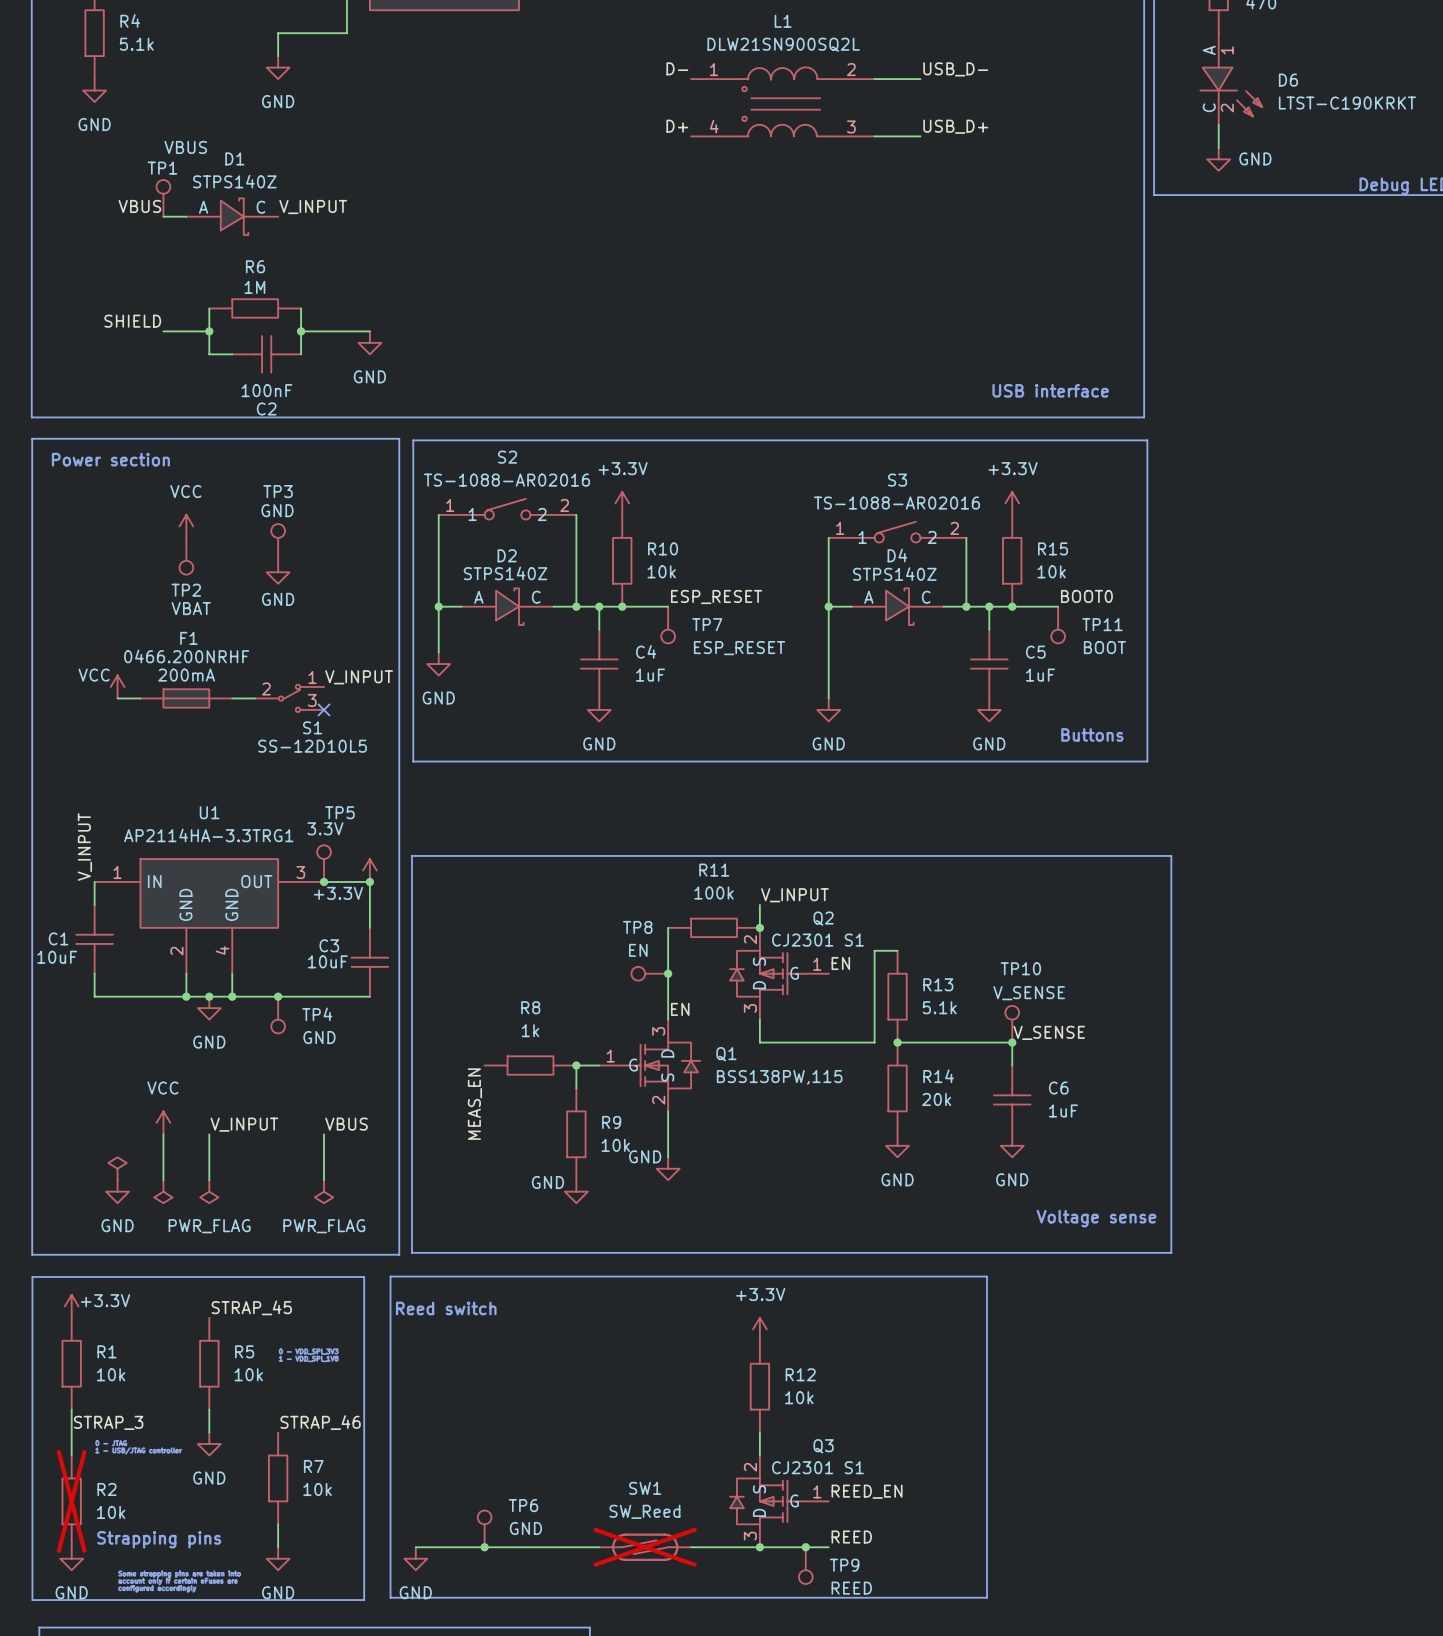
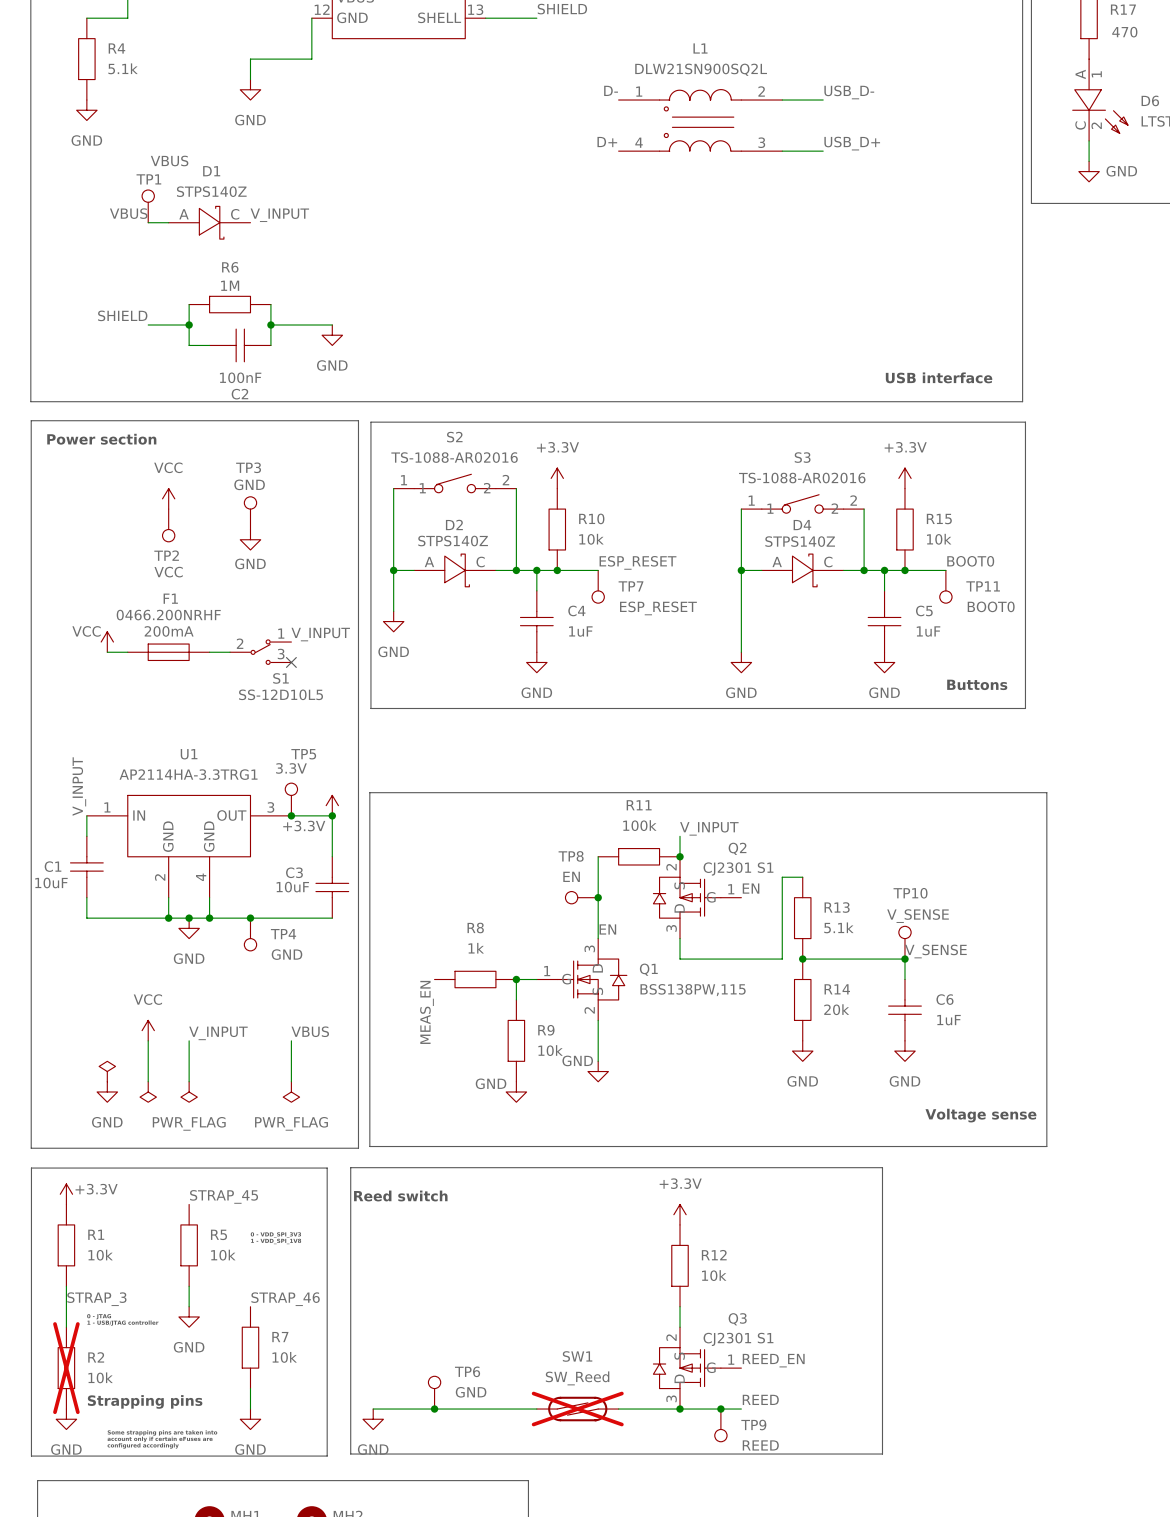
TP2 value: VBAT (191, 608) -> VCC (168, 572)
TP11 value: BOOT (1104, 647) -> BOOT0 (991, 606)

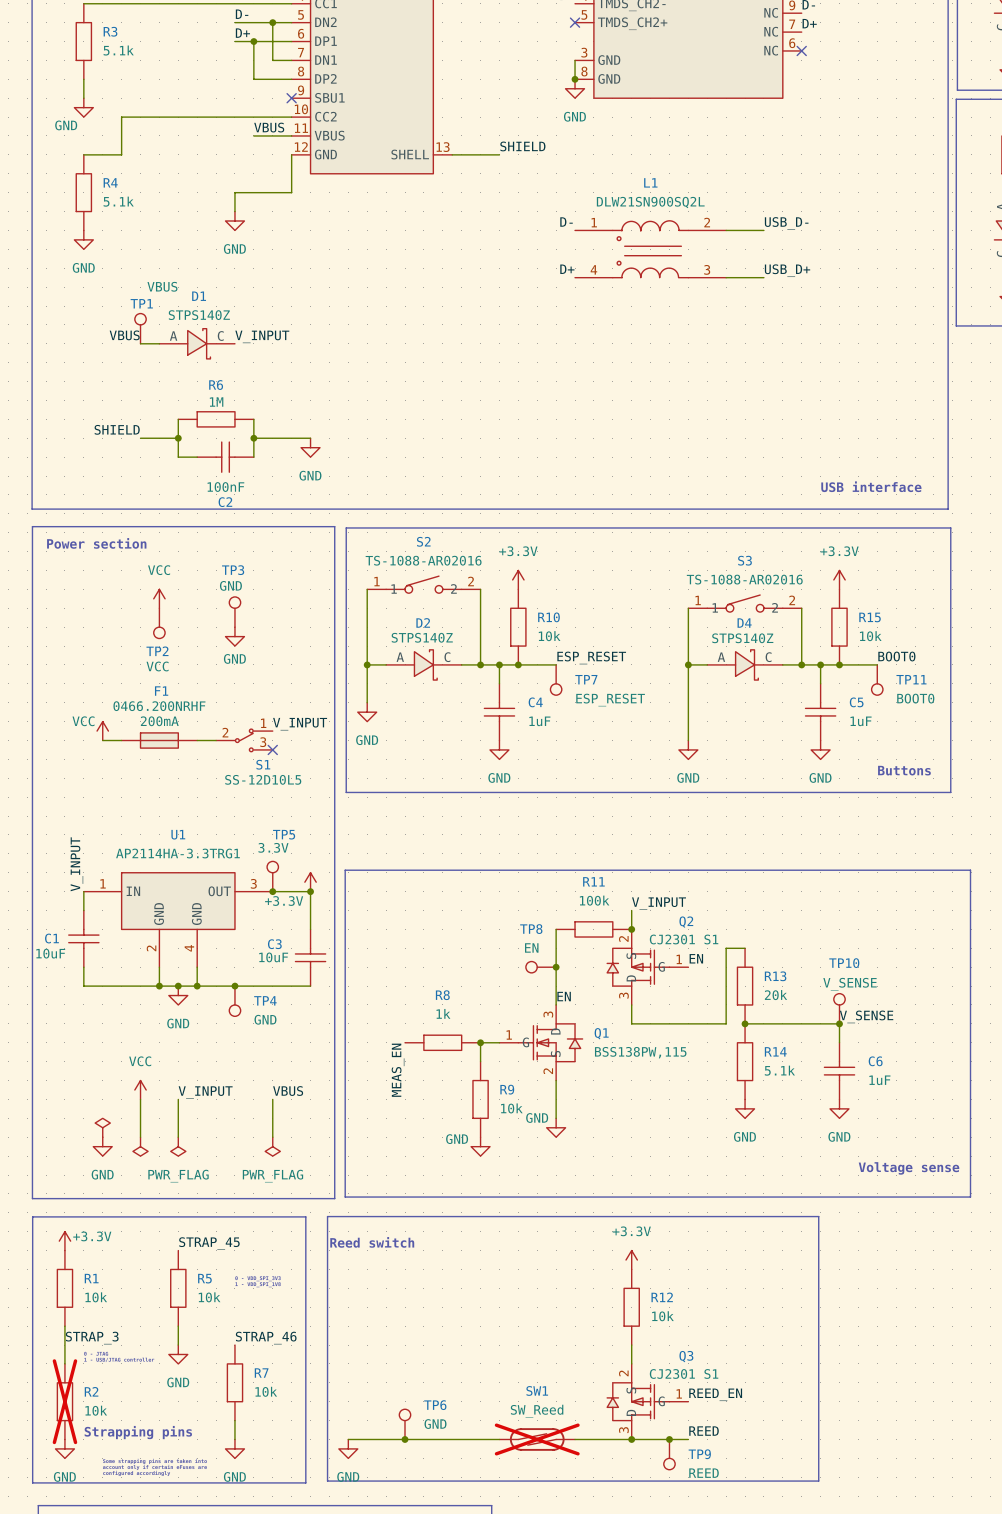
R13 text: 5.1k (838, 927) -> 20k (776, 995)
R14 text: 20k (836, 1009) -> 5.1k (779, 1070)

